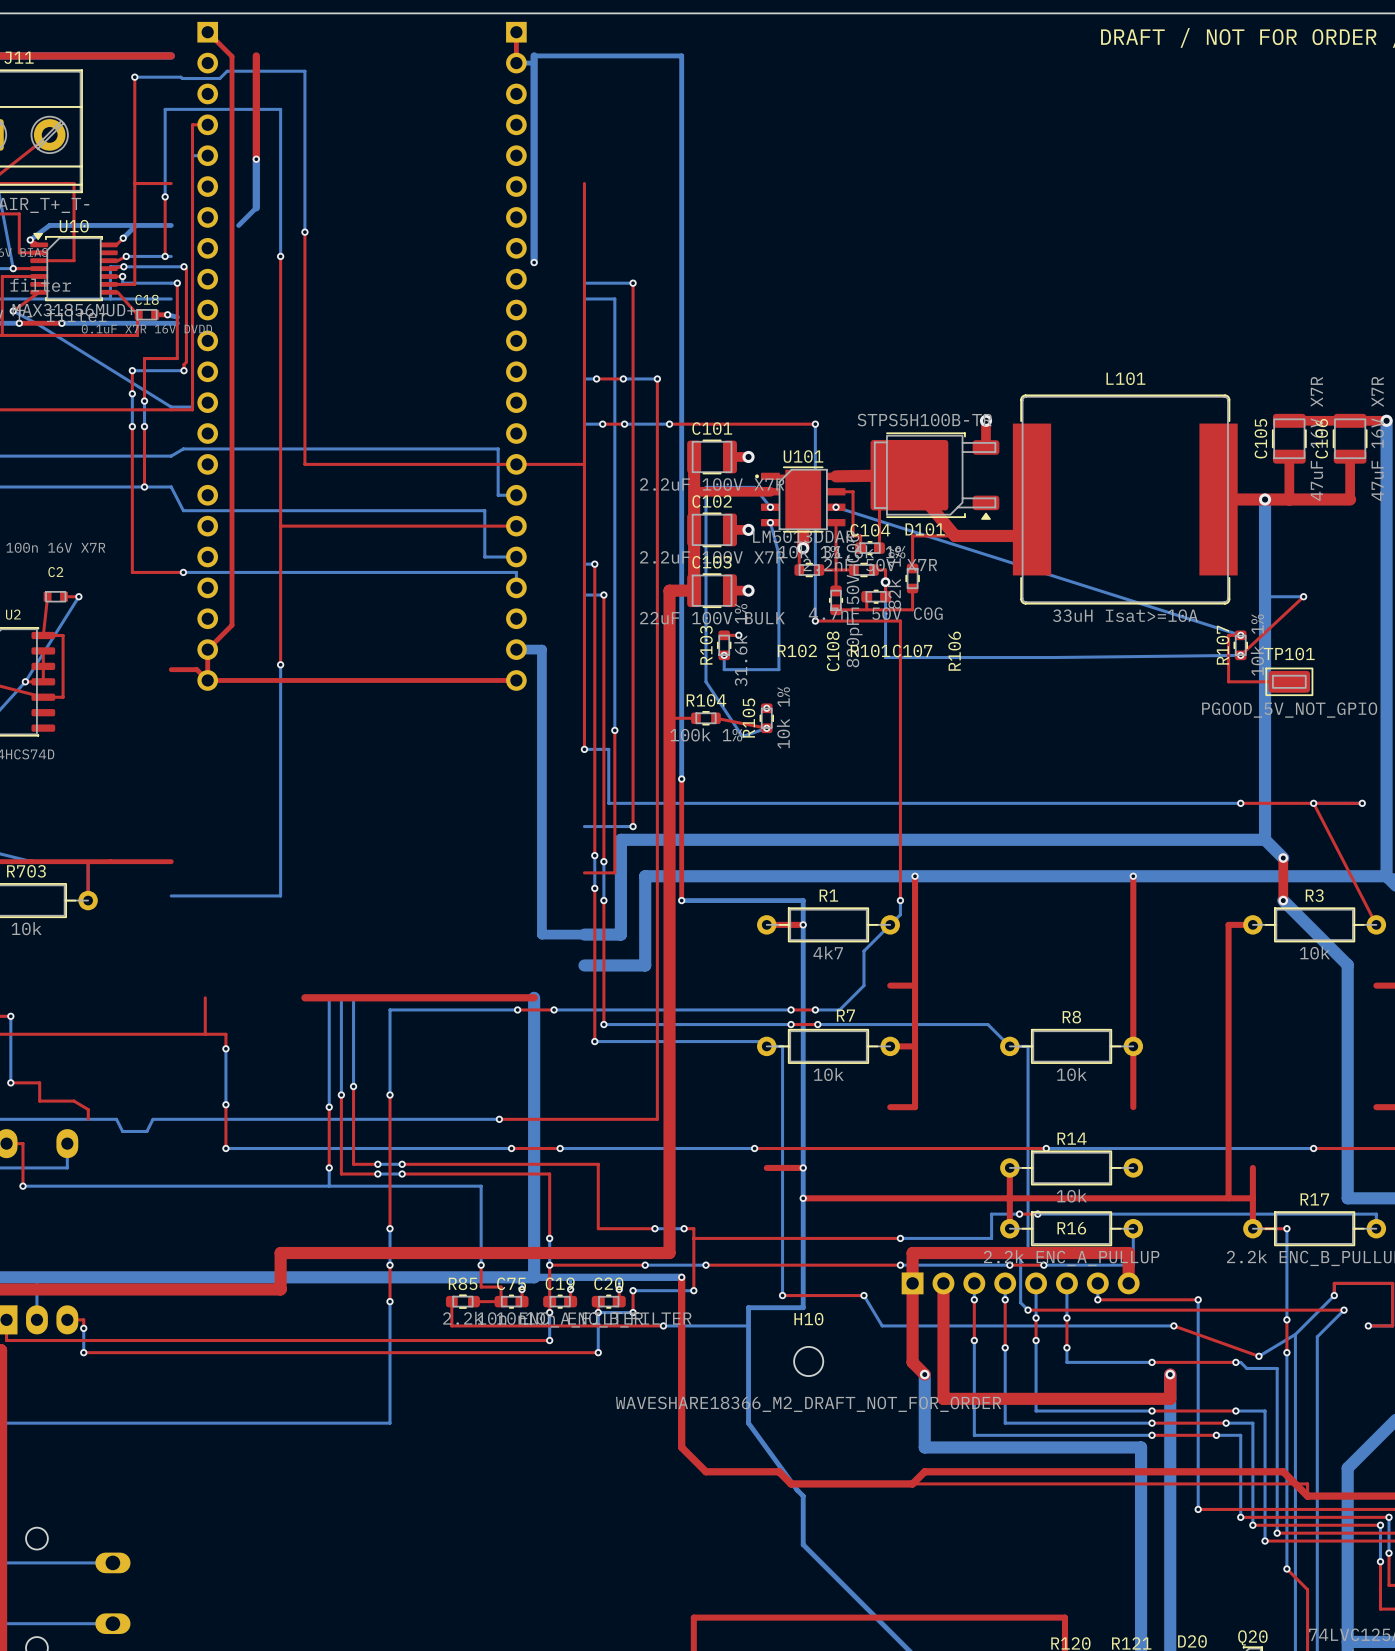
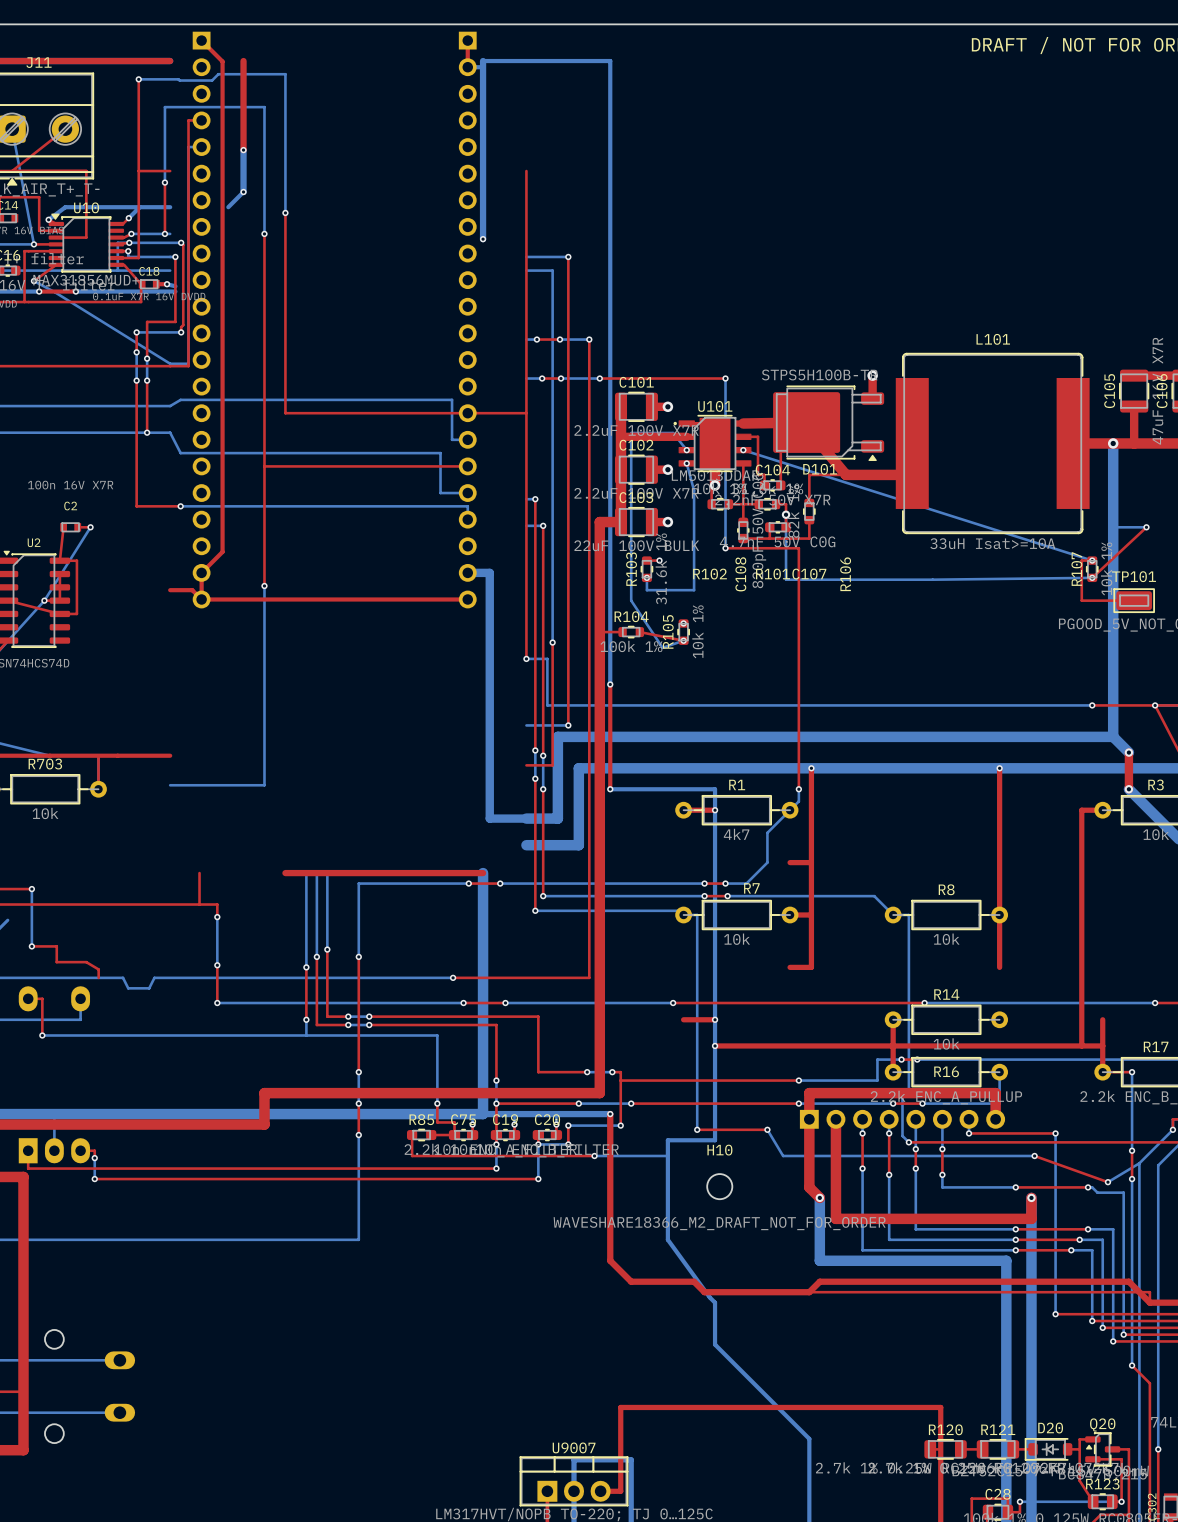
via: none -> (243, 192)

